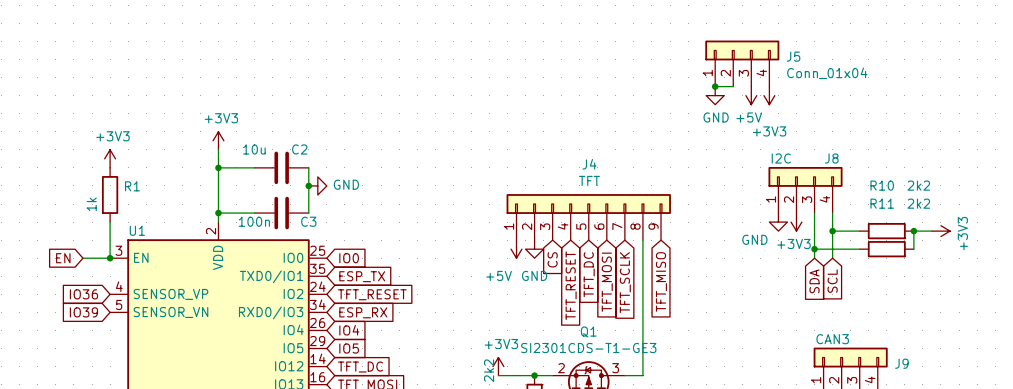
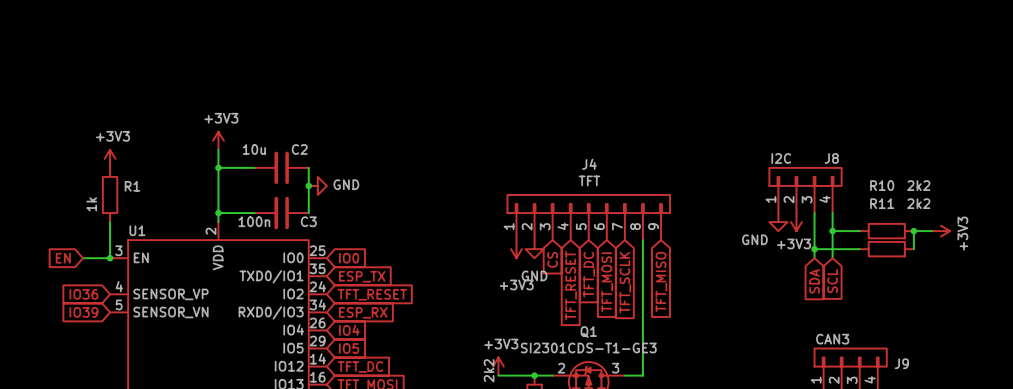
J5: Conn_01x04 (742, 63) -> none
wire: (715, 86) (733, 86) -> none
junction: (715, 86) -> none
power symbol: GND (715, 95) -> none
power symbol: +5V (751, 95) -> none
power symbol: +3V3 (769, 95) -> none
power symbol: +5V (516, 249) -> +3V3 (516, 249)

